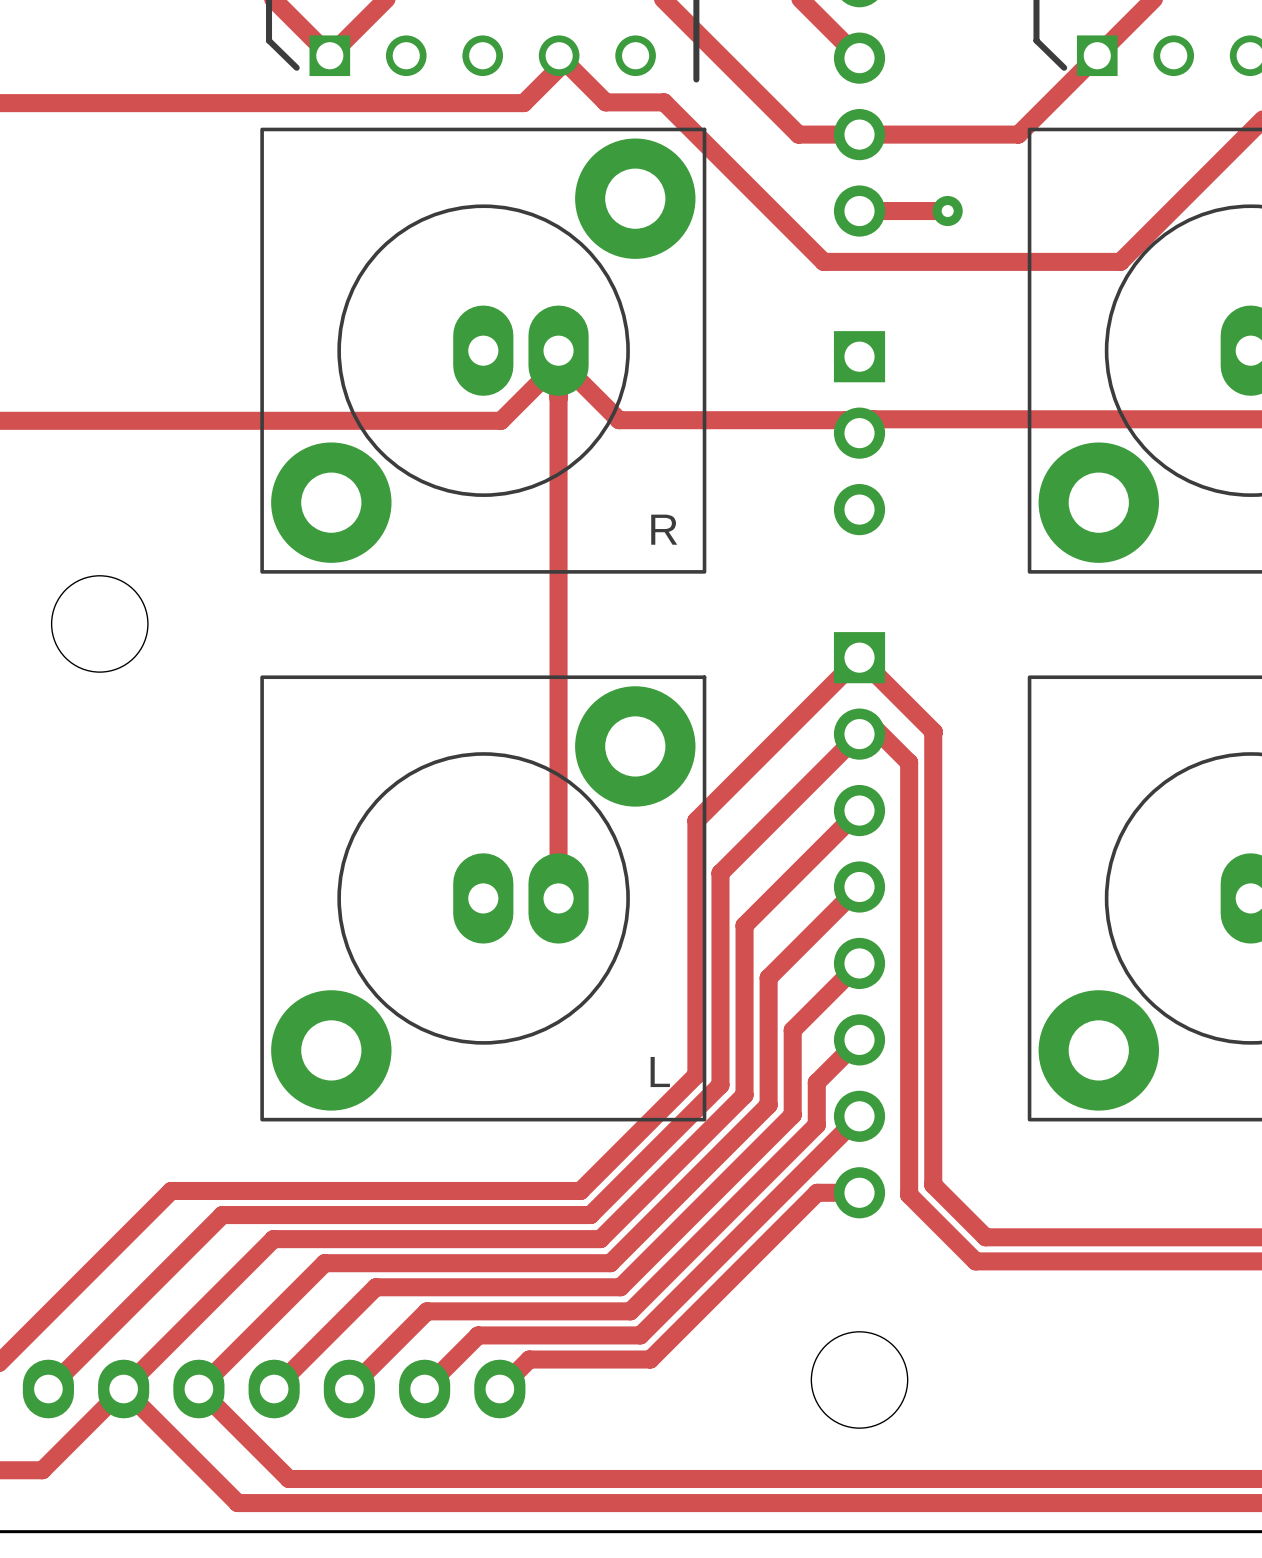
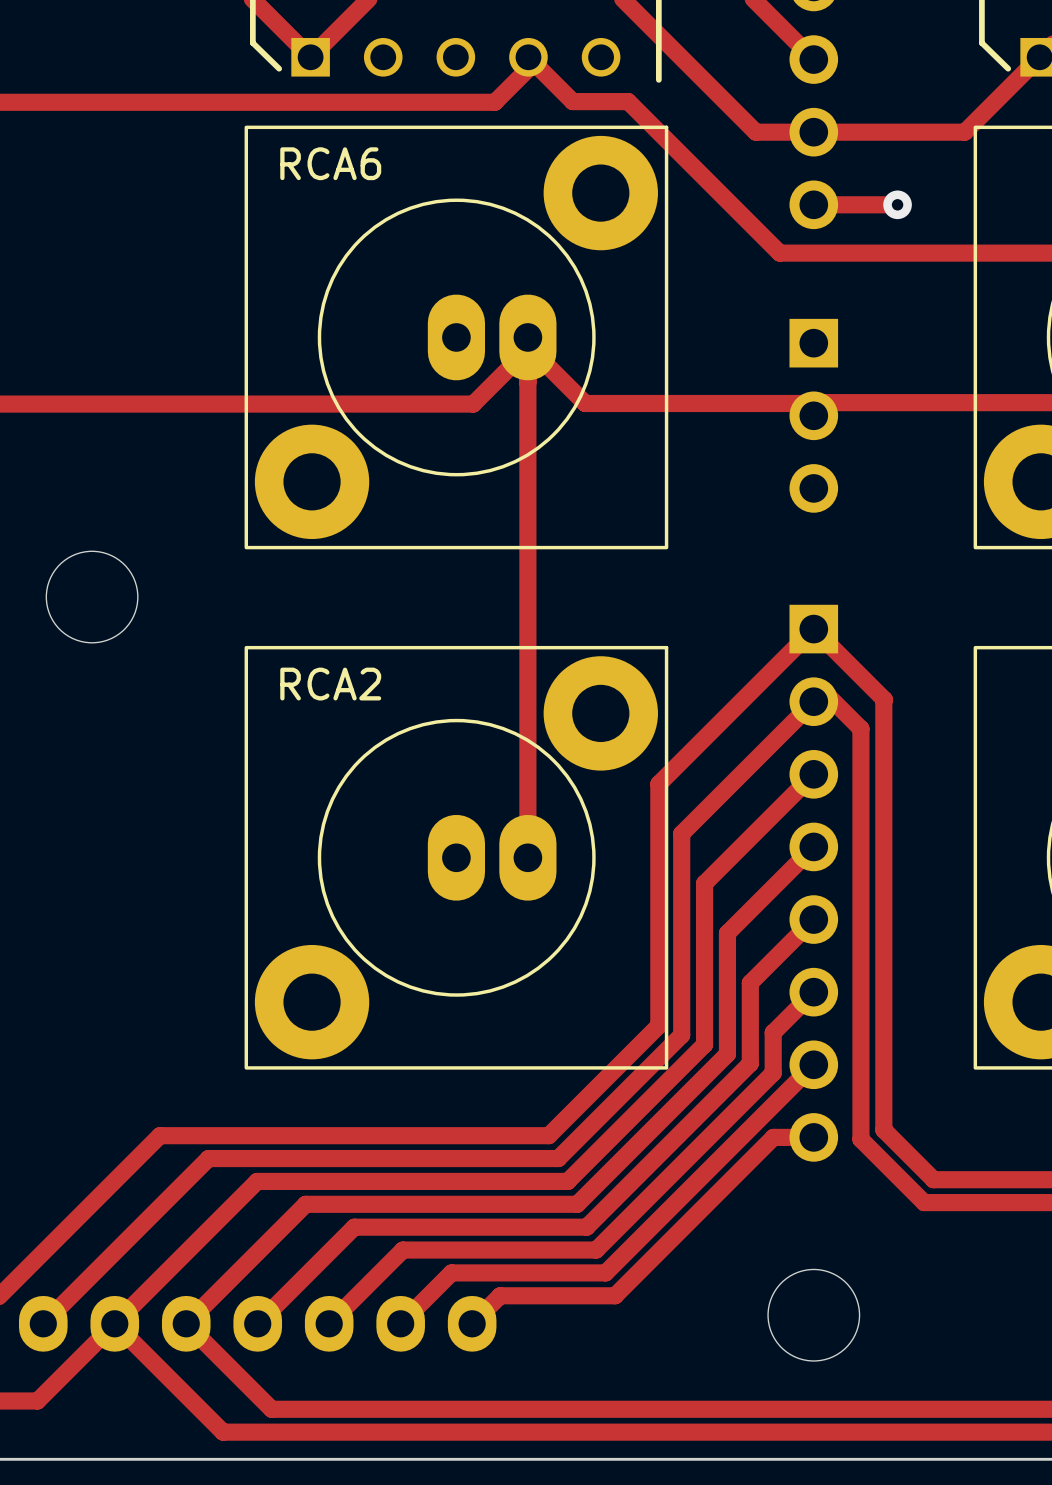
RCA6 name: none -> RCA6 (330, 163)
text: R (664, 529) -> none
RCA2 name: none -> RCA2 (330, 684)
text: L (660, 1072) -> none

